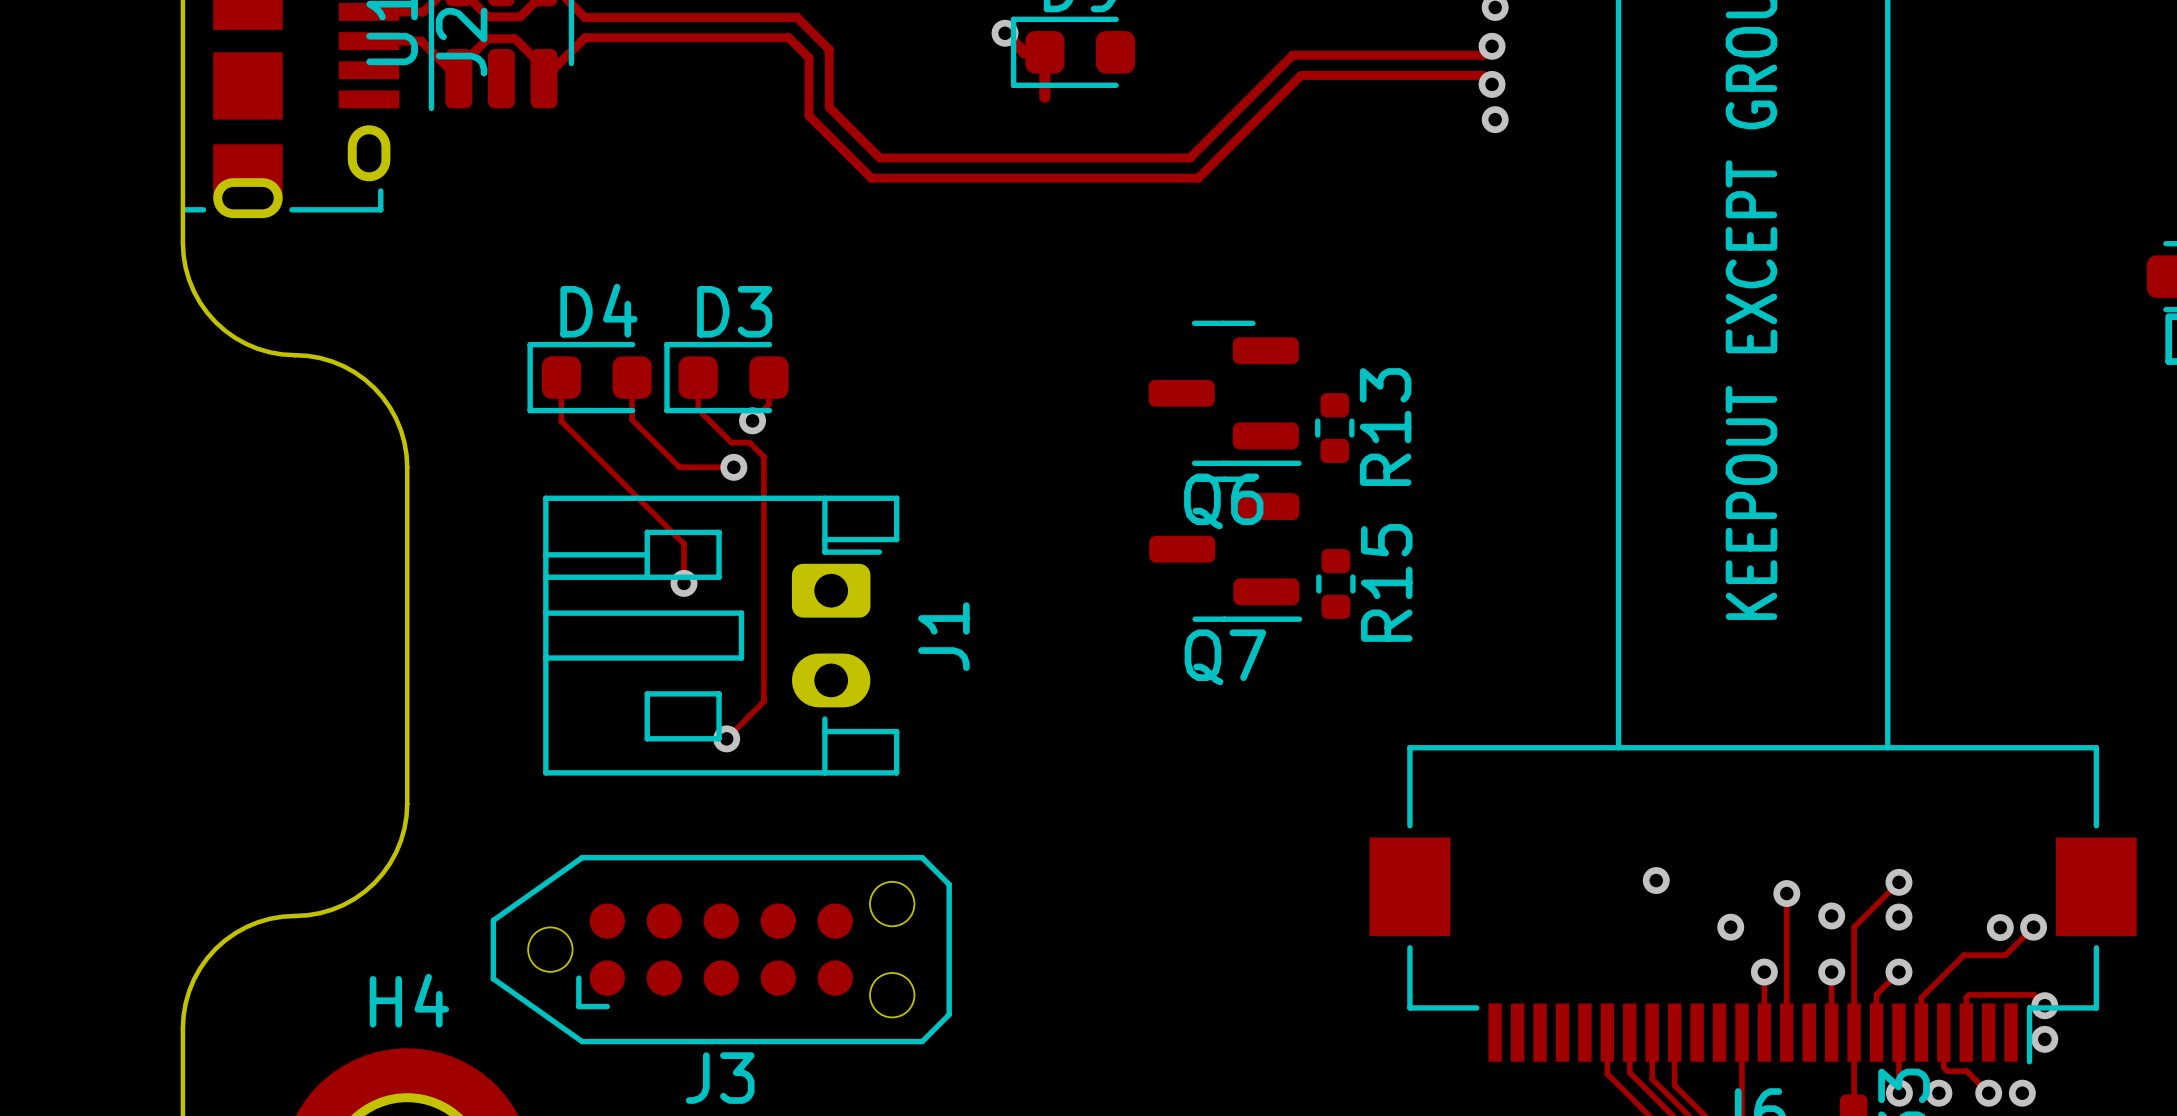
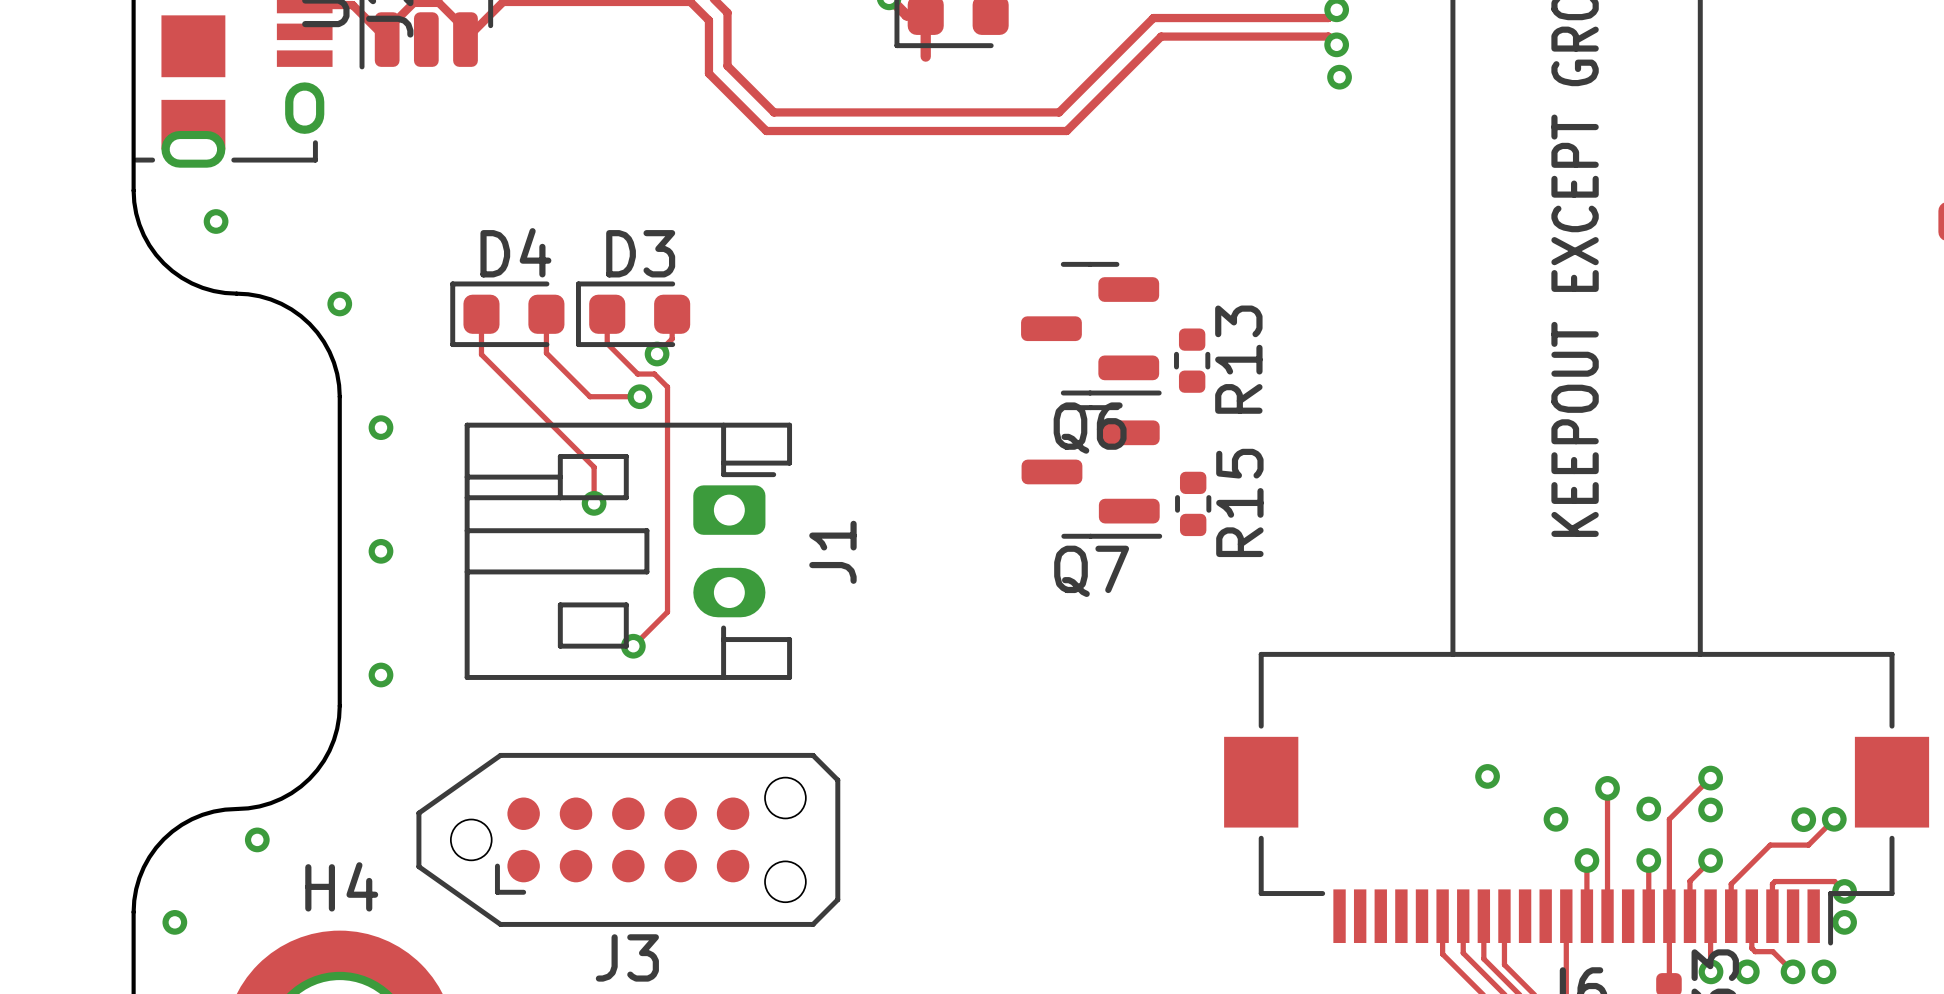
via: none -> (216, 221)
via: none -> (339, 303)
via: none -> (380, 427)
via: none -> (380, 551)
via: none -> (380, 675)
via: none -> (257, 839)
via: none -> (174, 922)

